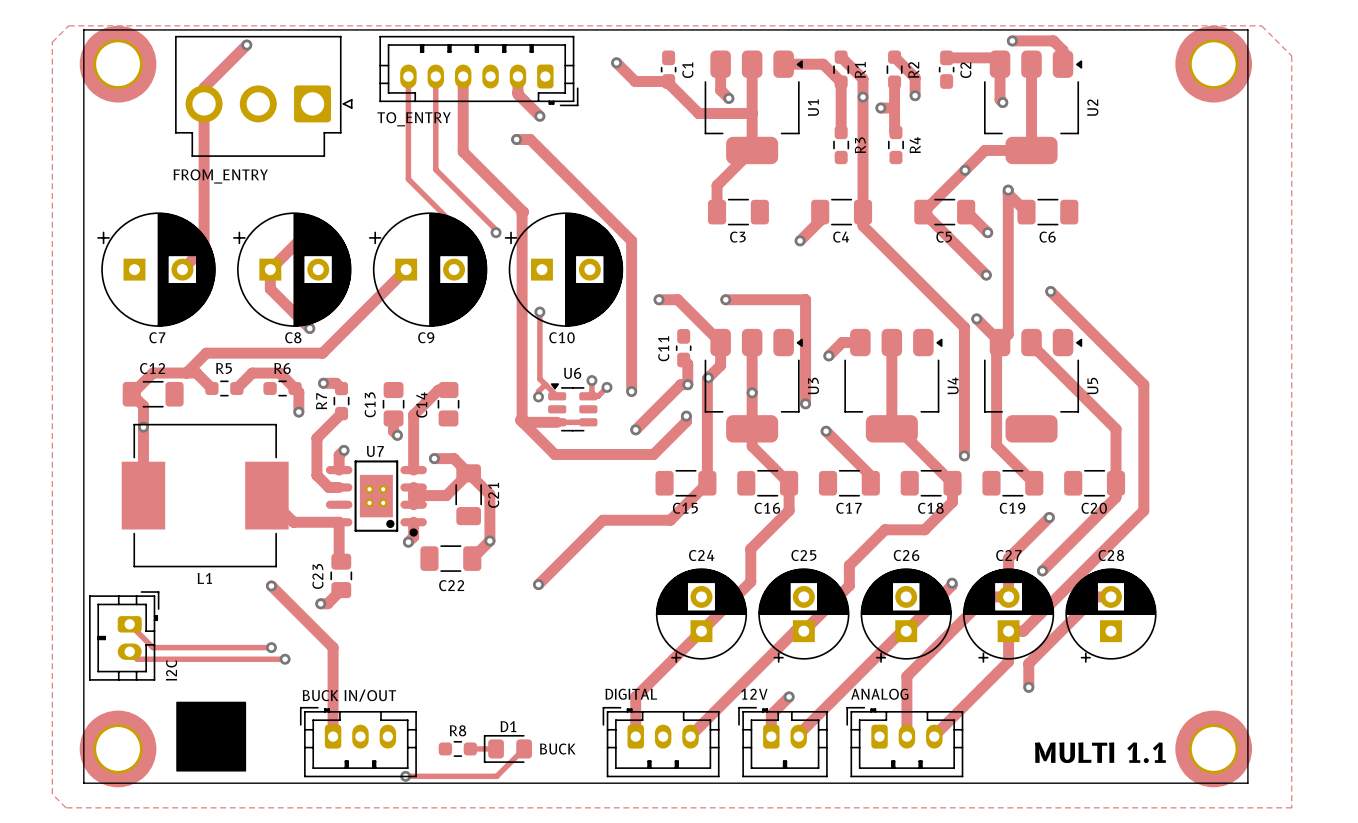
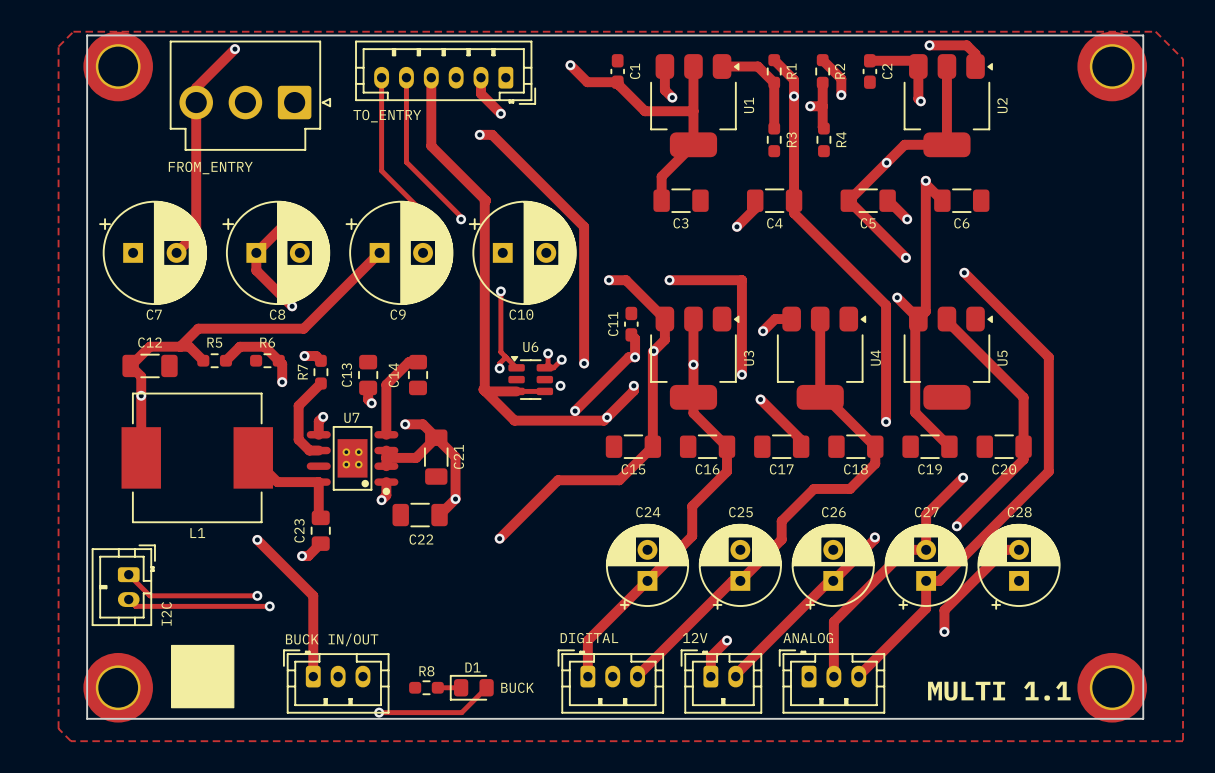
via: none -> (560, 385)
track: none -> (587, 398) (575, 411)
via: (635, 429) -> none
via: none -> (575, 411)
via: none -> (607, 417)

